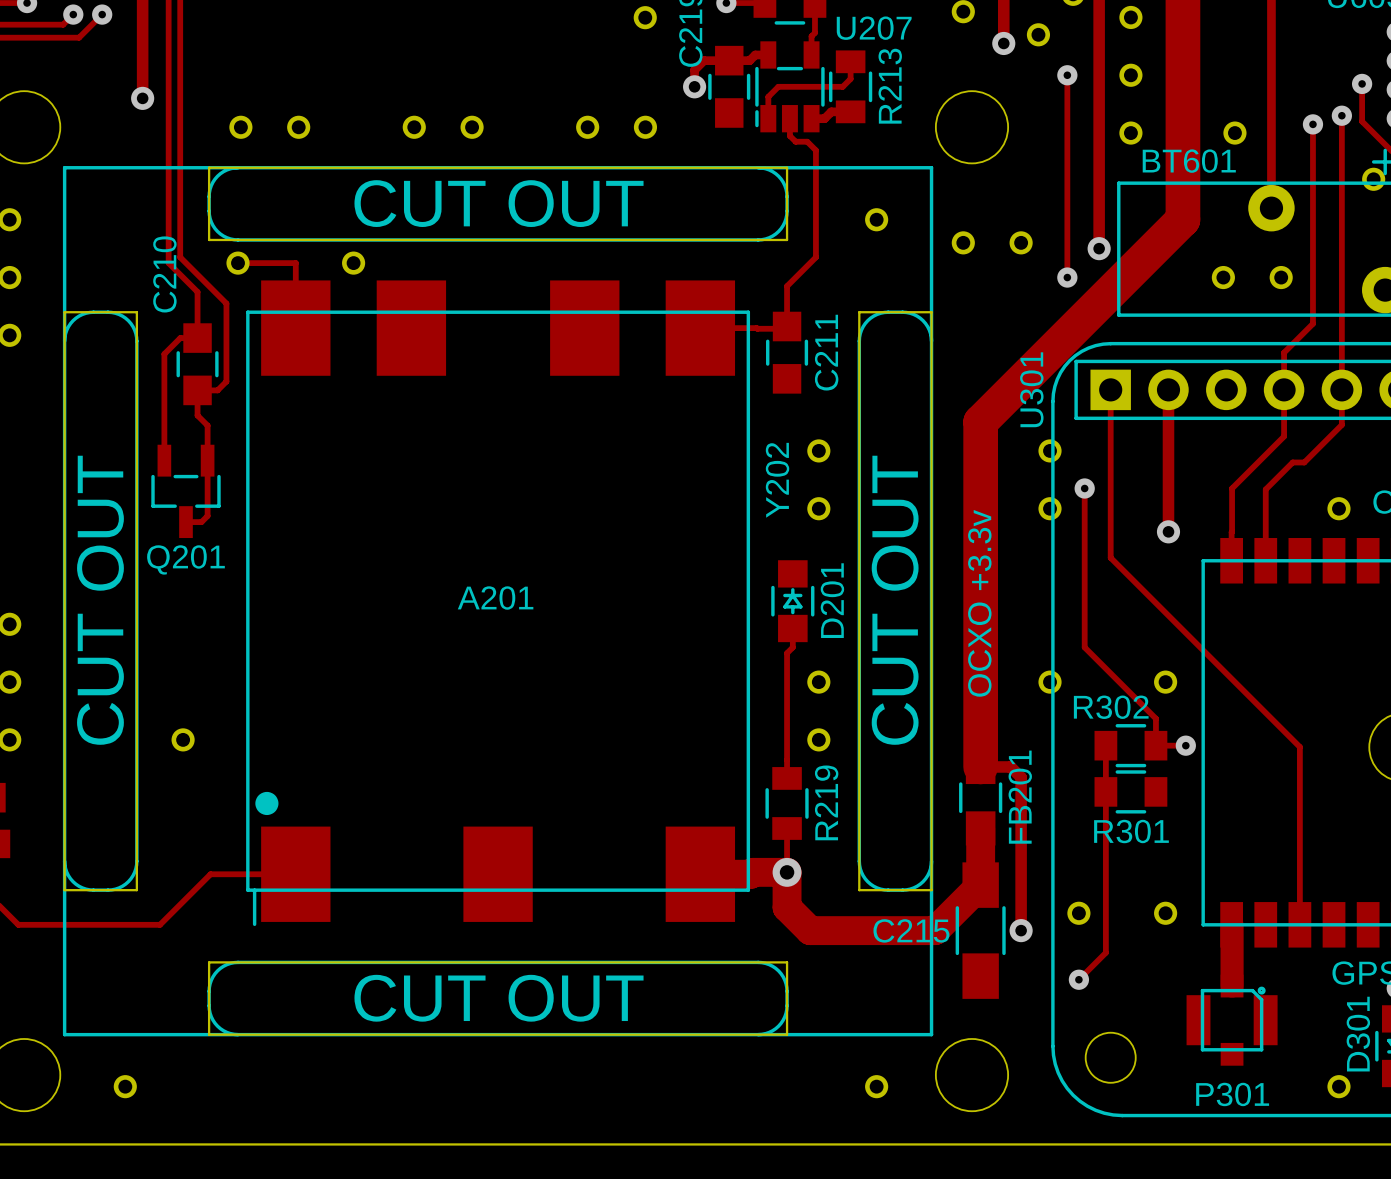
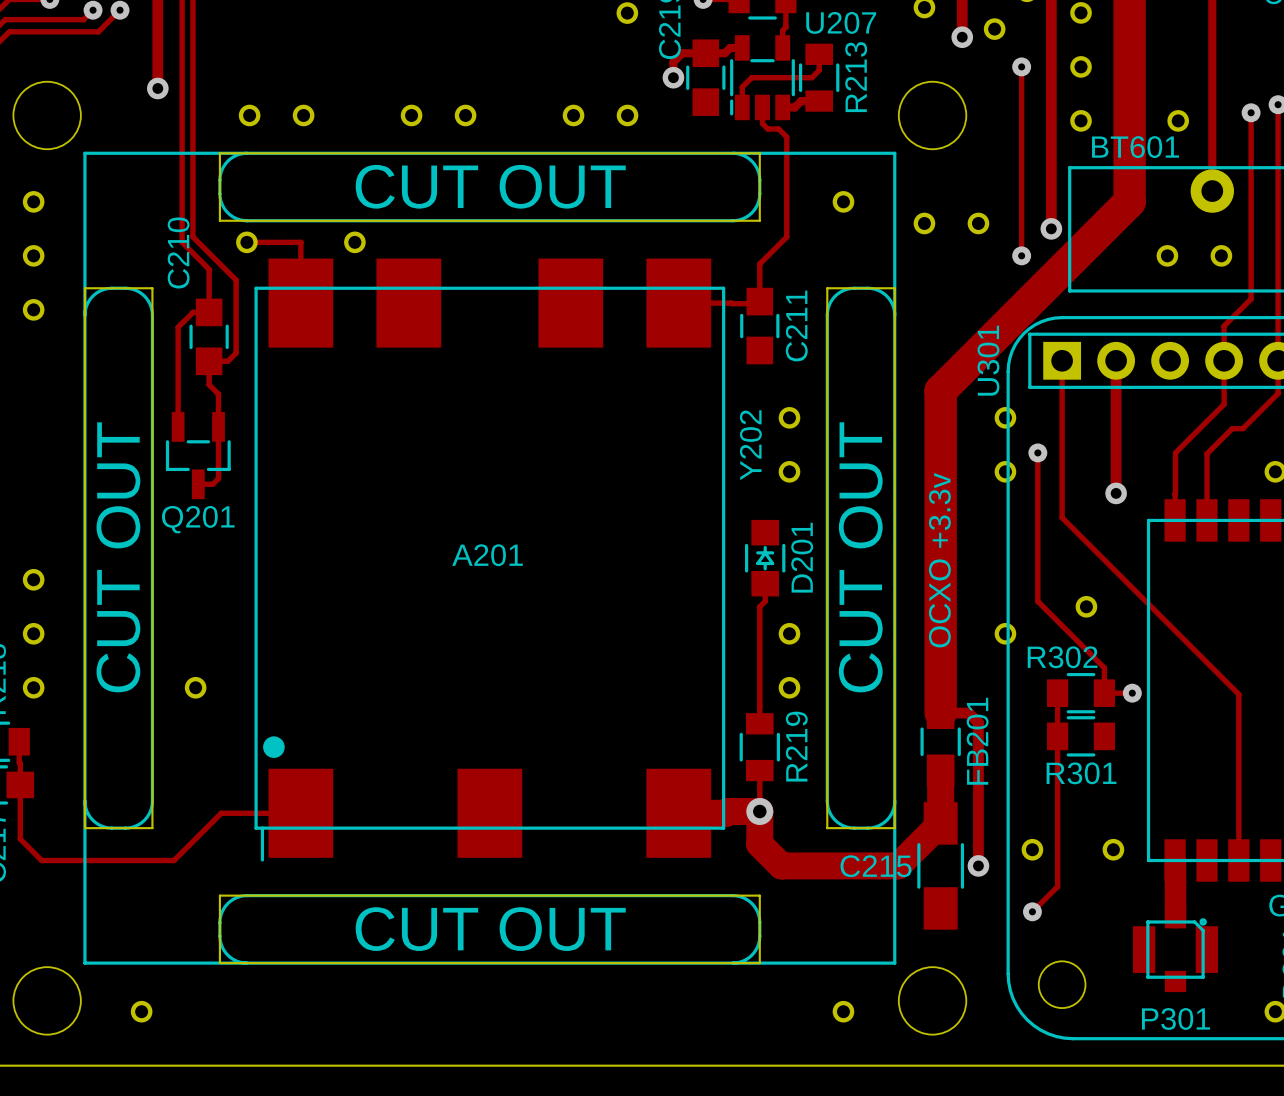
part position: (1165, 682) -> (1086, 606)

